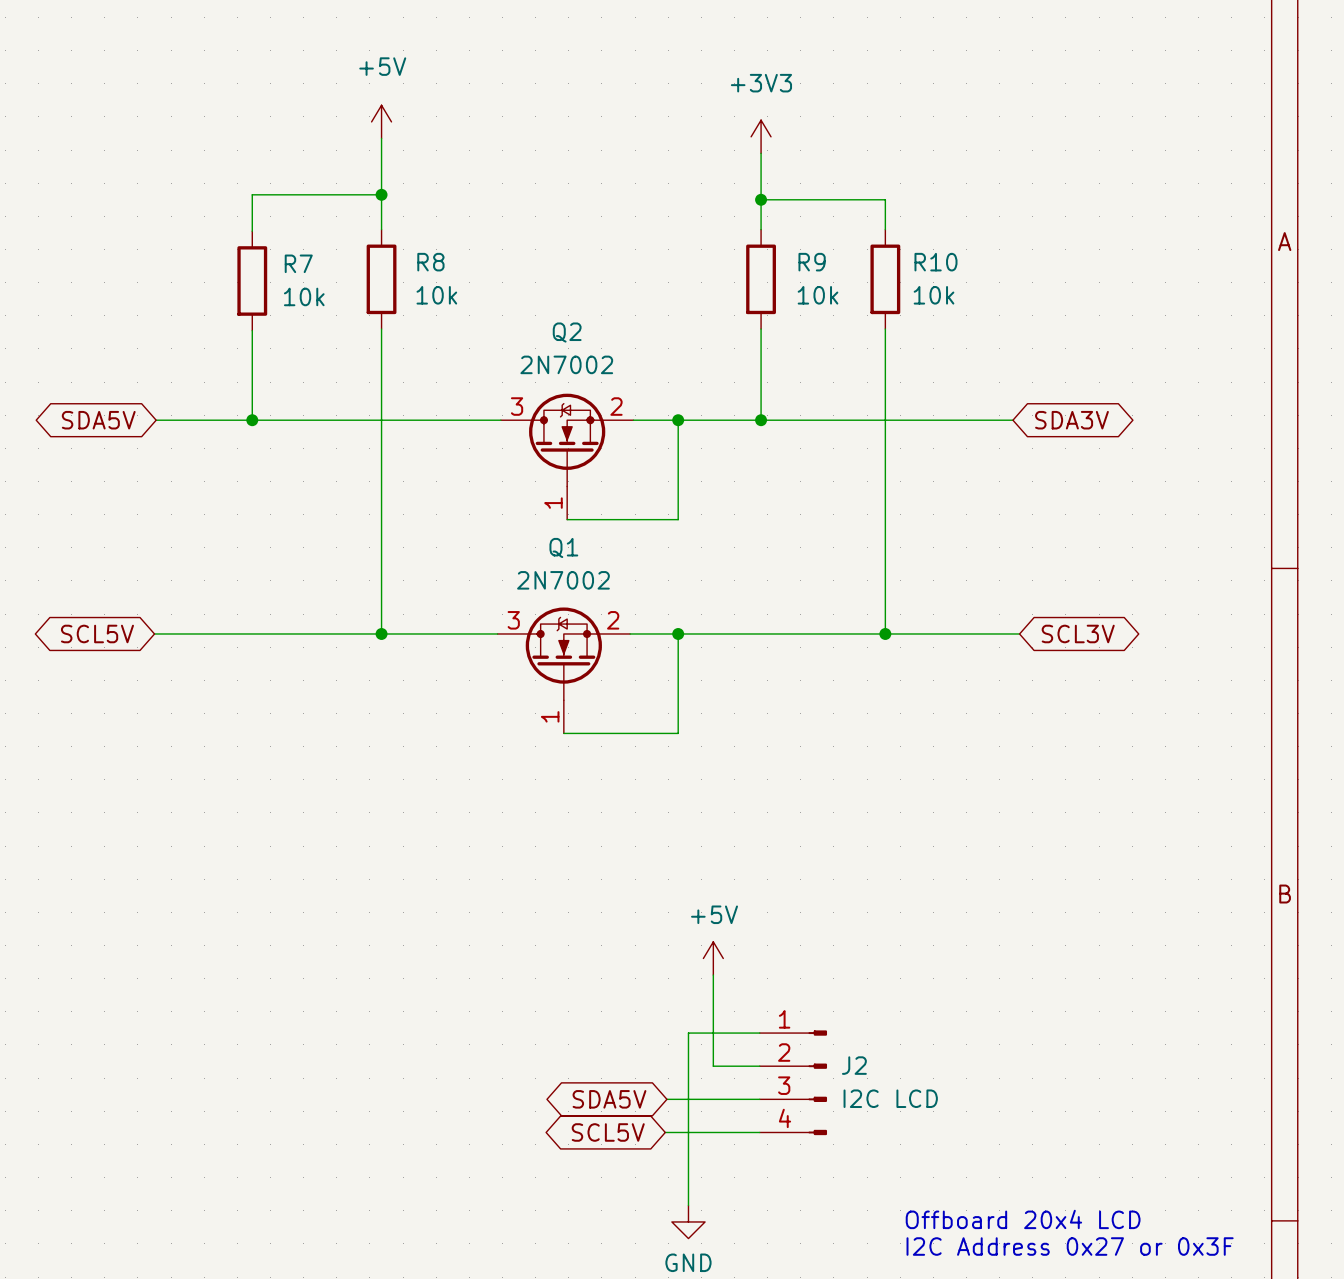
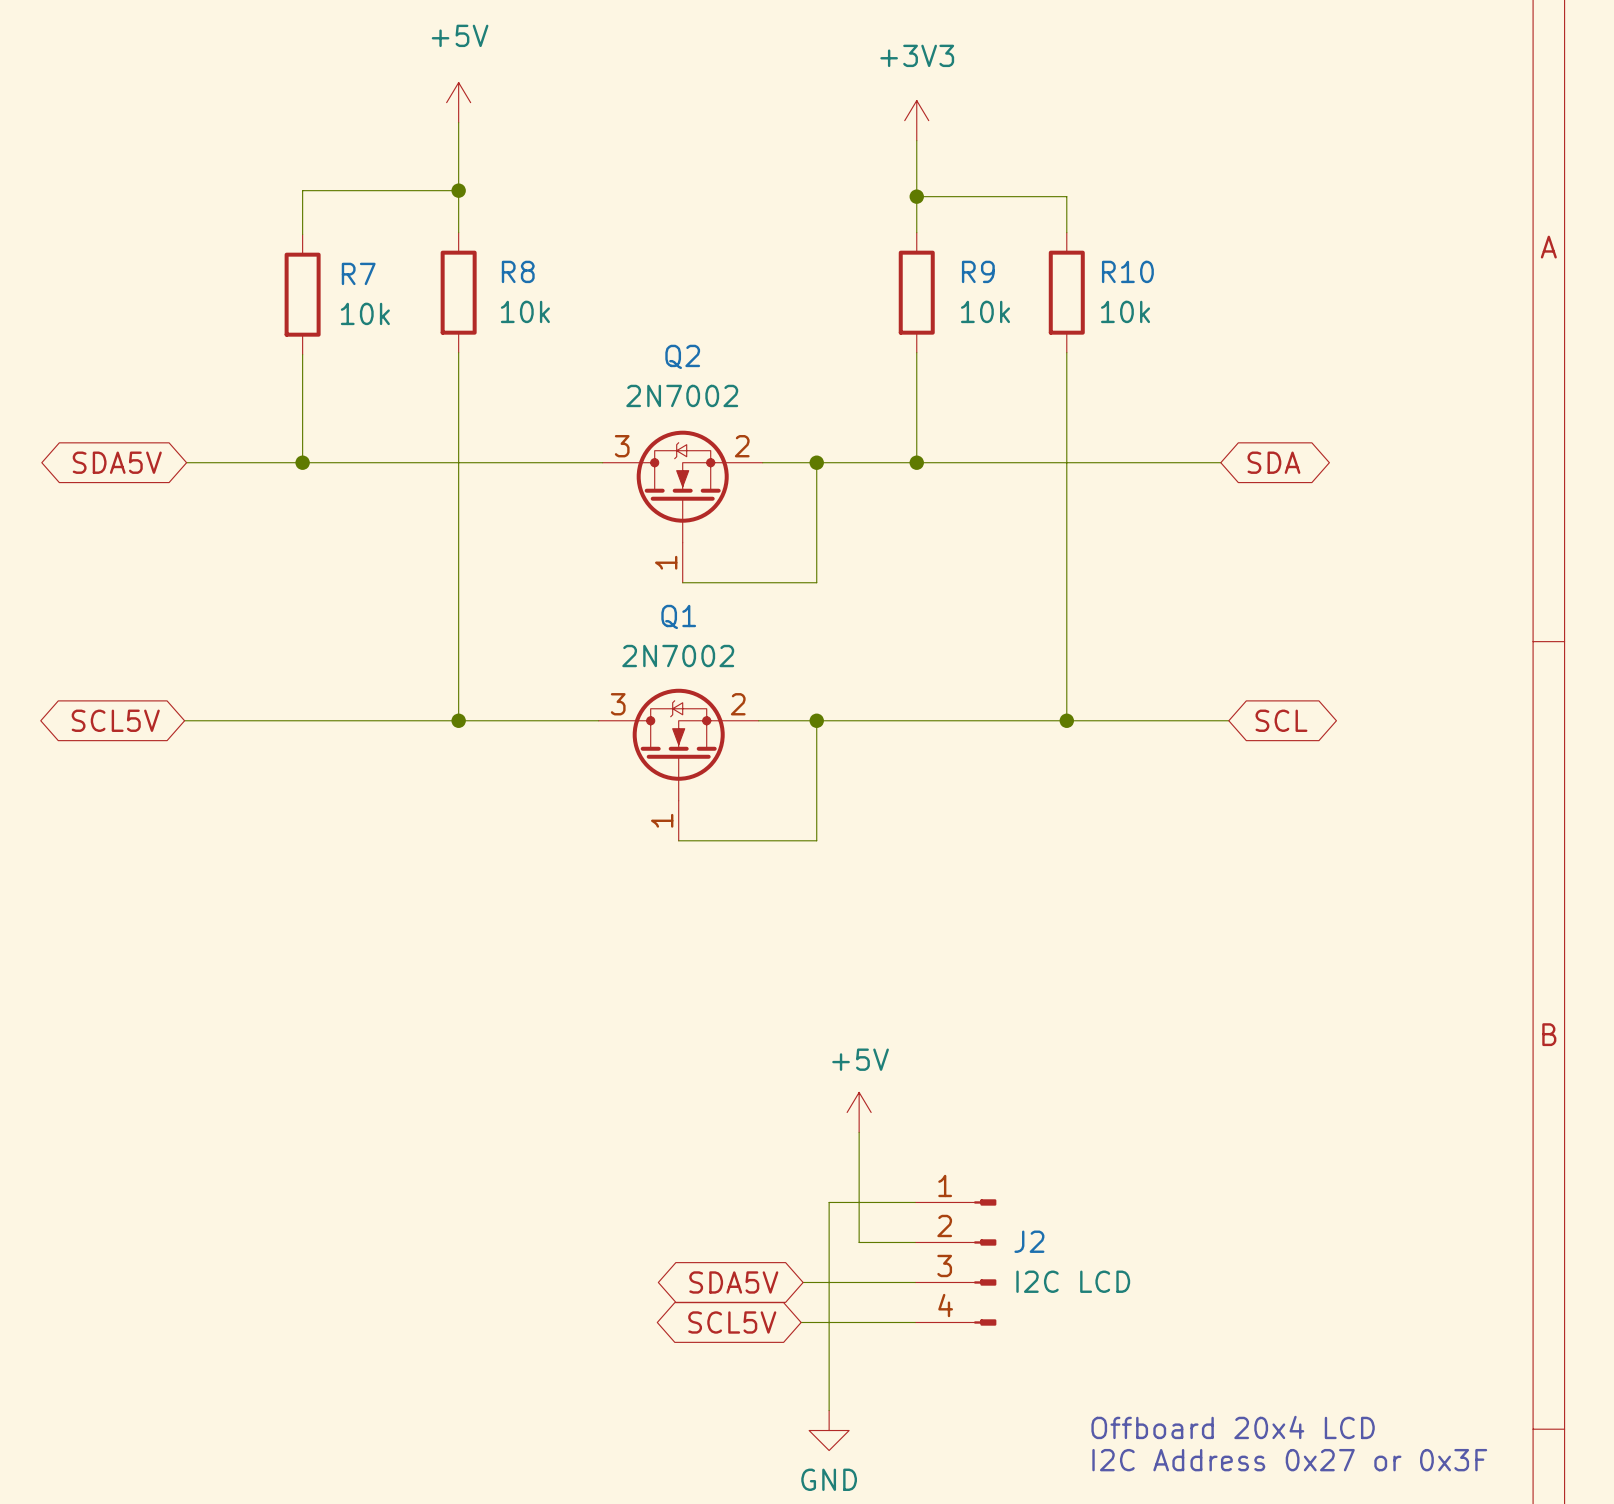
global label: SDA3V (1071, 420) -> SDA (1273, 462)
global label: SCL3V (1078, 633) -> SCL (1281, 720)

